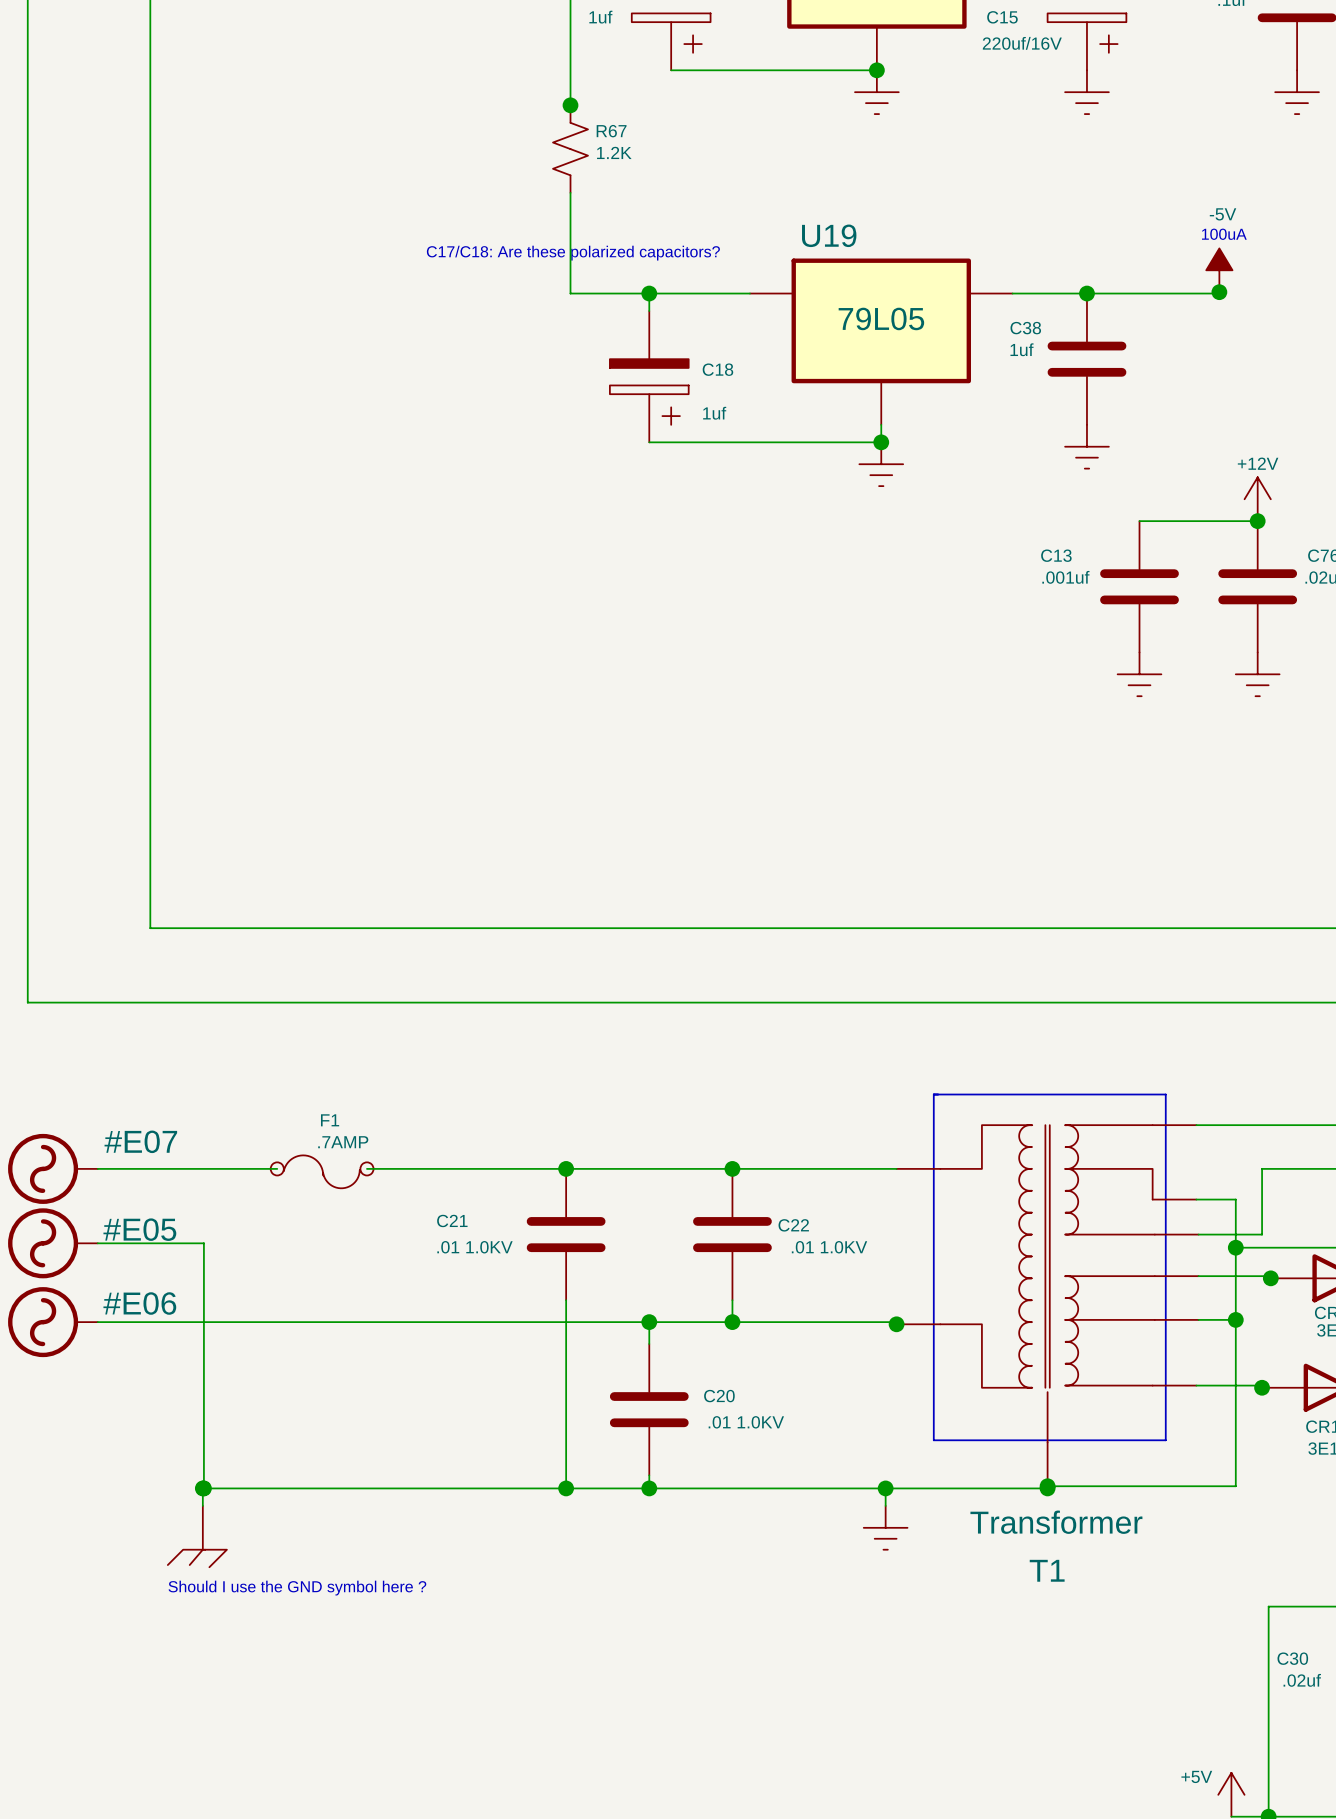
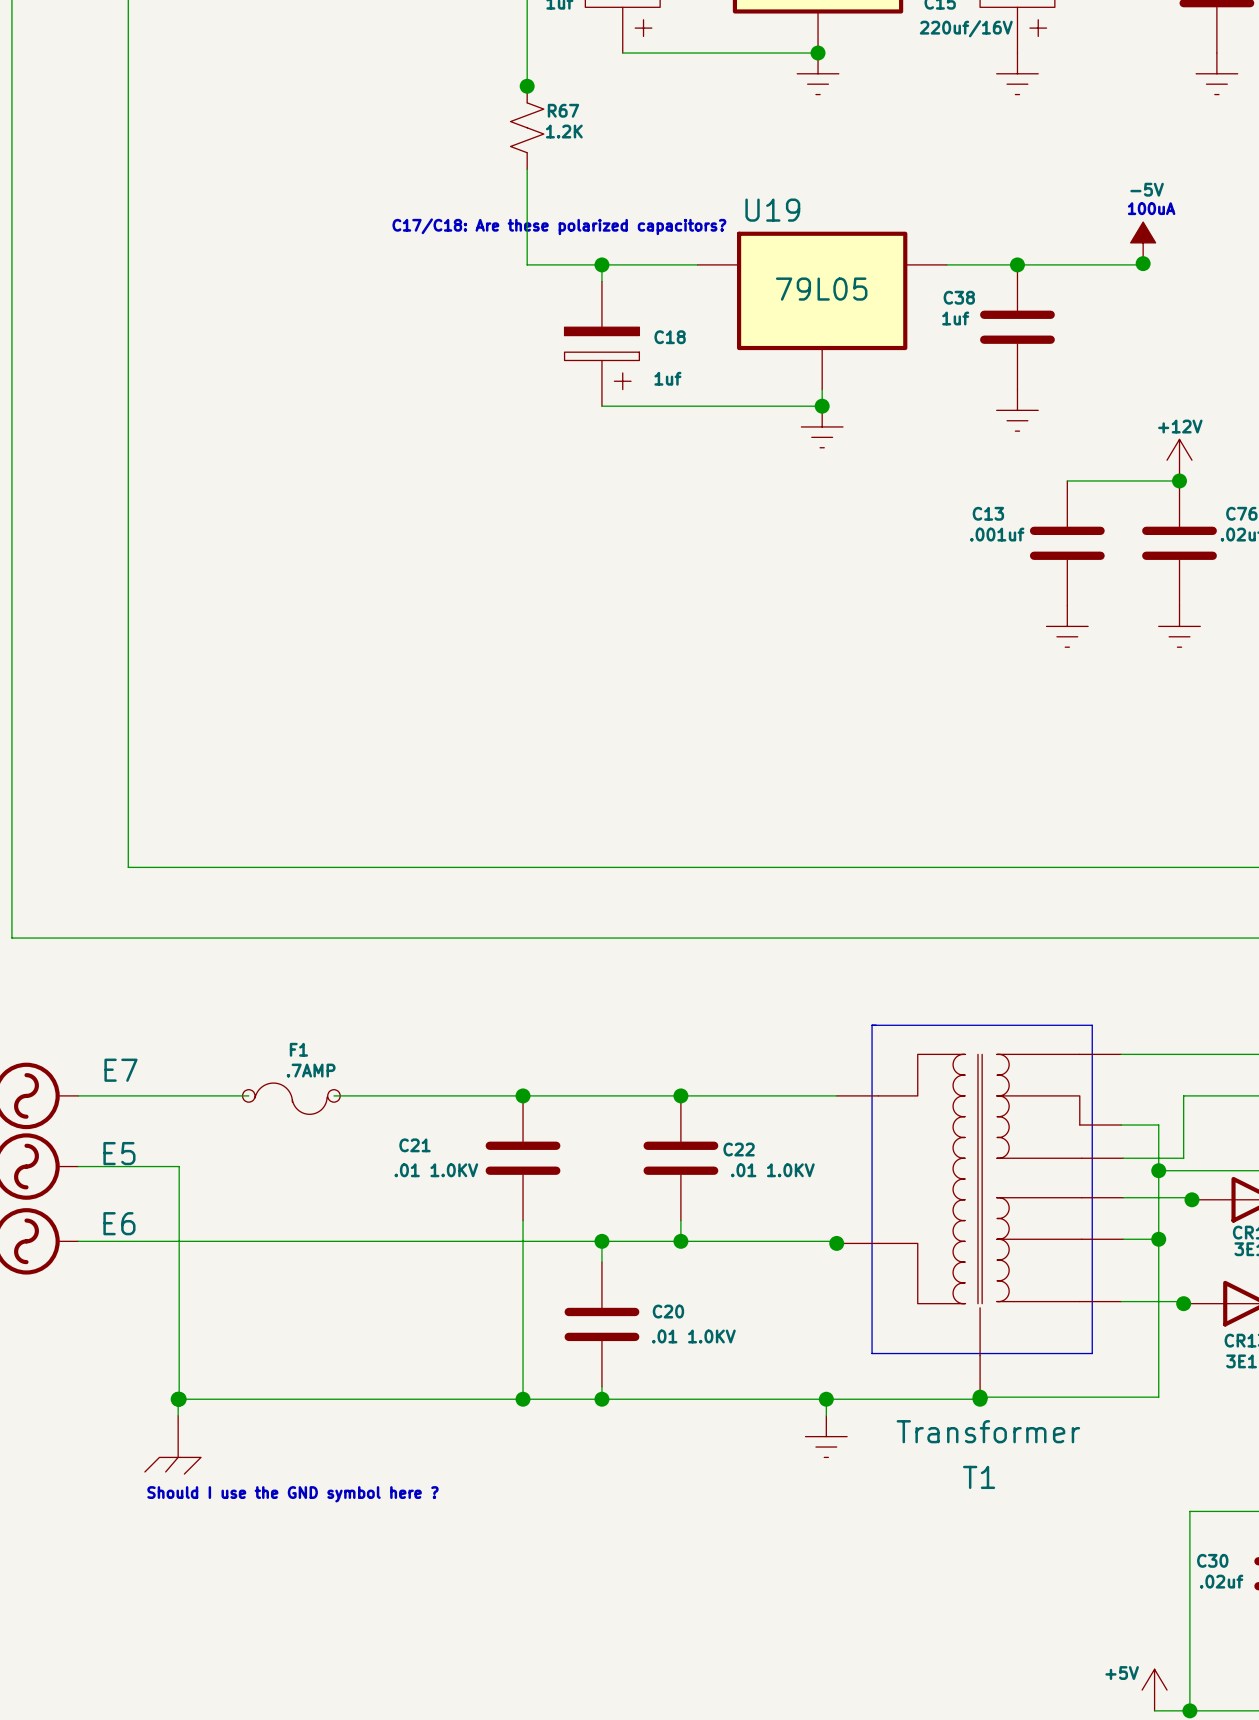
#E07 name: #E07 (140, 1141) -> E7 (120, 1070)
#E05 name: #E05 (139, 1229) -> E5 (119, 1153)
#E06 name: #E06 (139, 1303) -> E6 (119, 1223)

